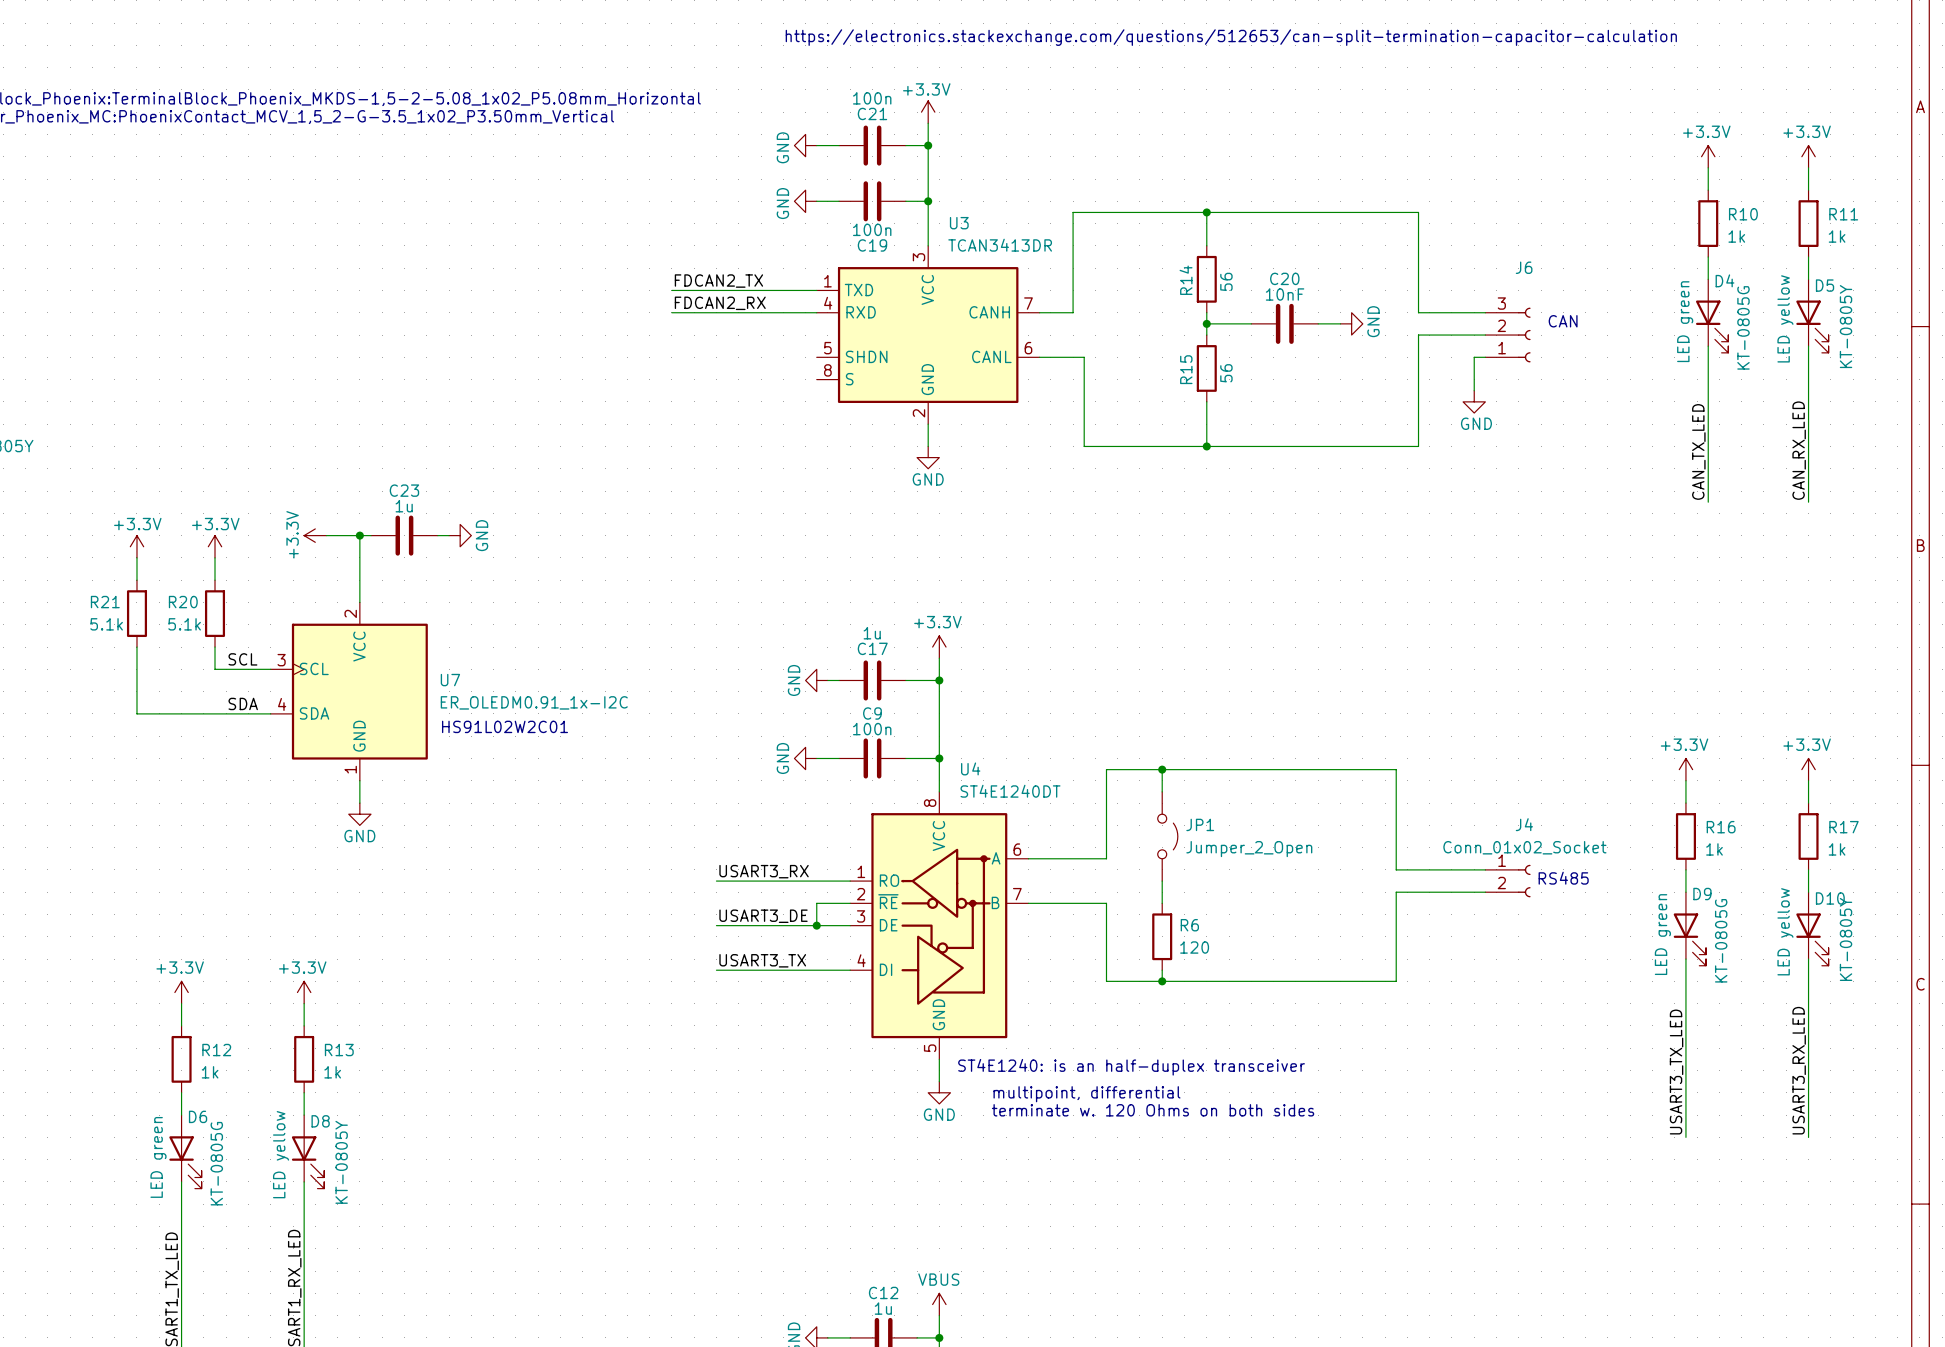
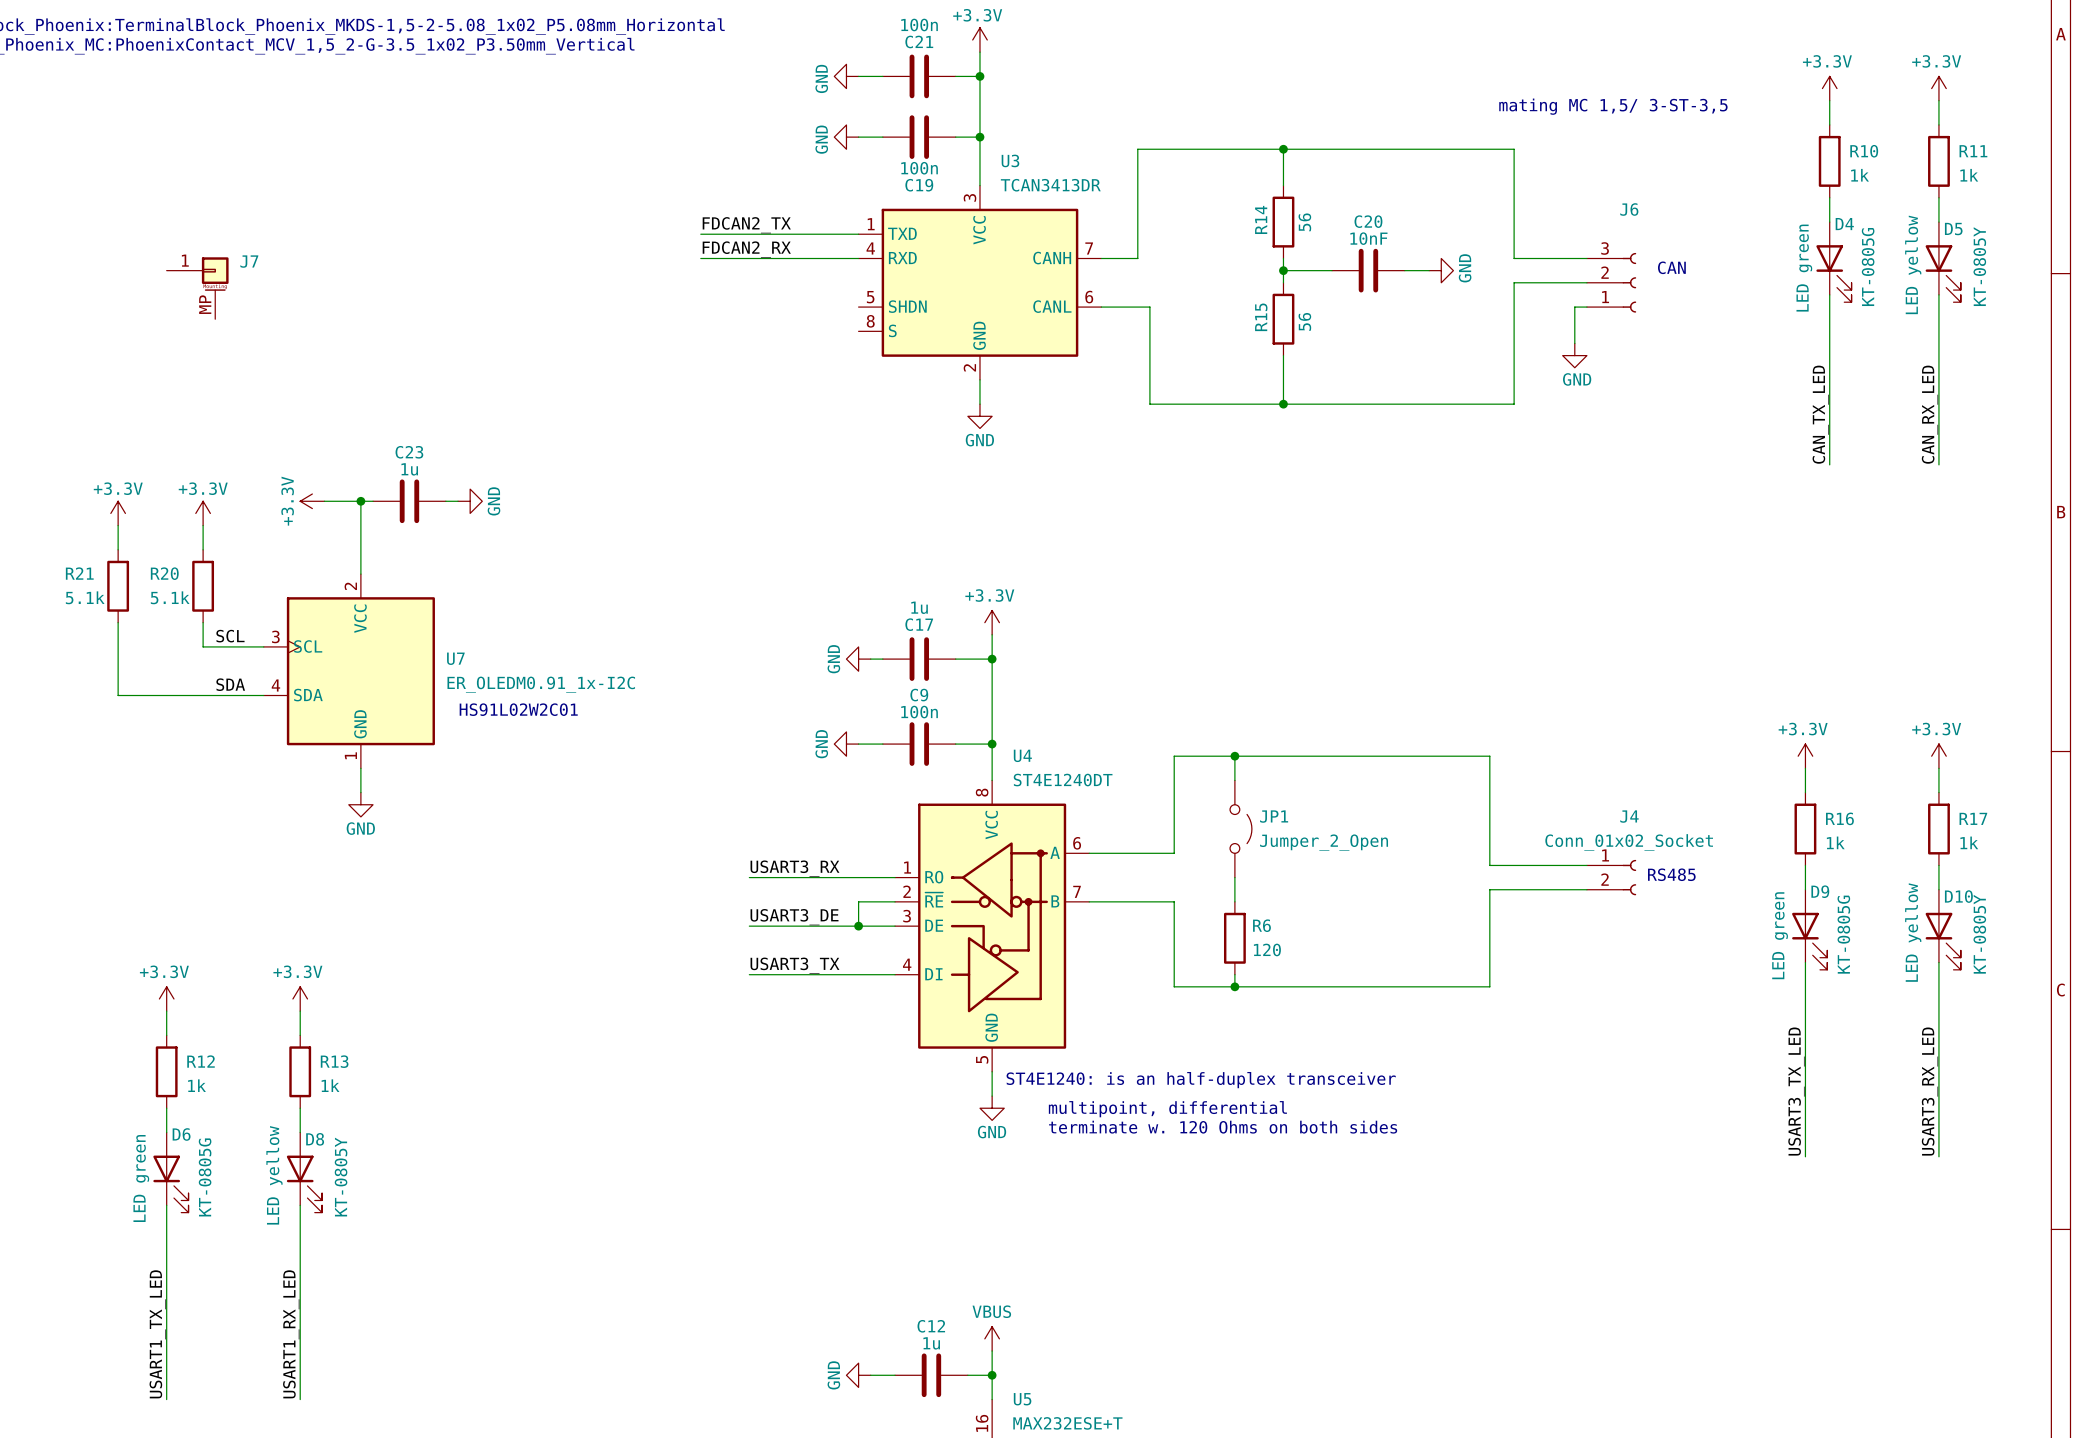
text: none -> mating MC 1,5/ 3-ST-3,5 (1613, 106)
J7: none -> (197, 288)

